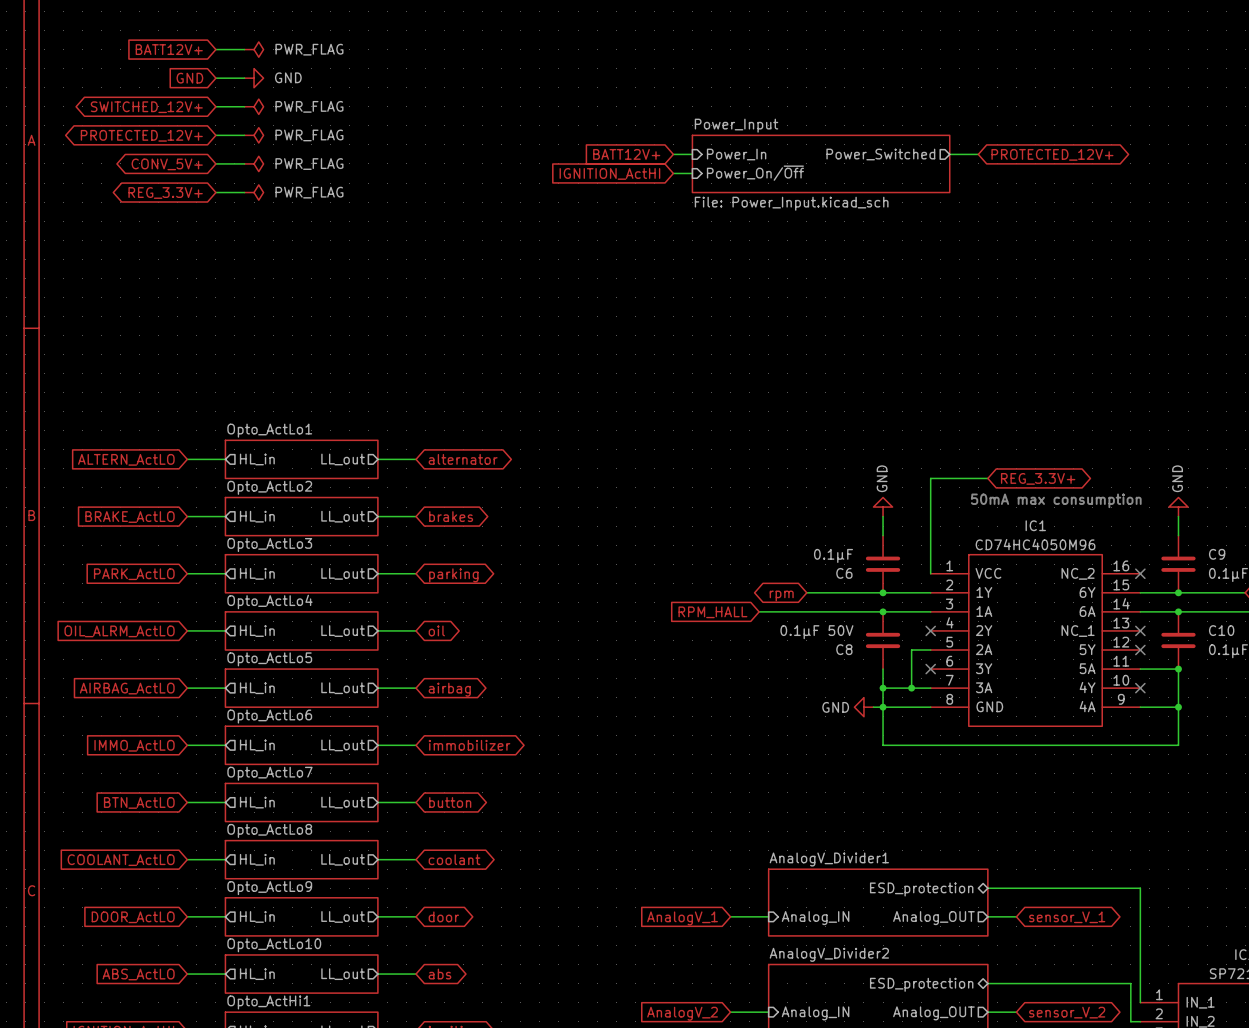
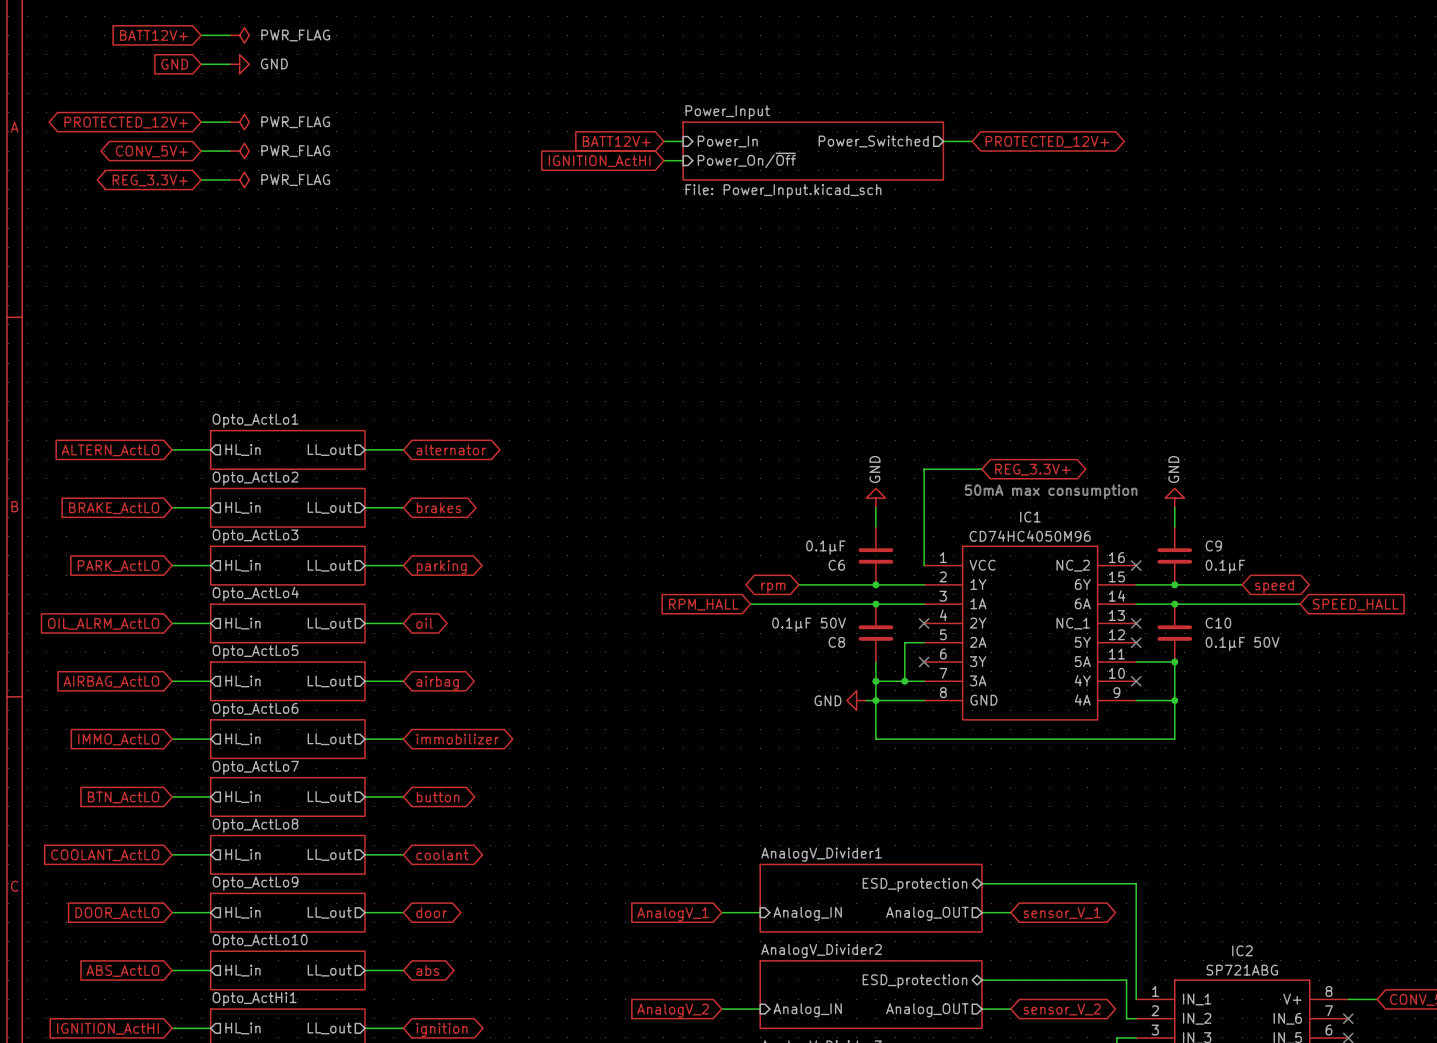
wire: (215, 106) (244, 106) -> none
power symbol: PWR_FLAG (254, 106) -> none
global label: SWITCHED_12V+ (146, 107) -> none

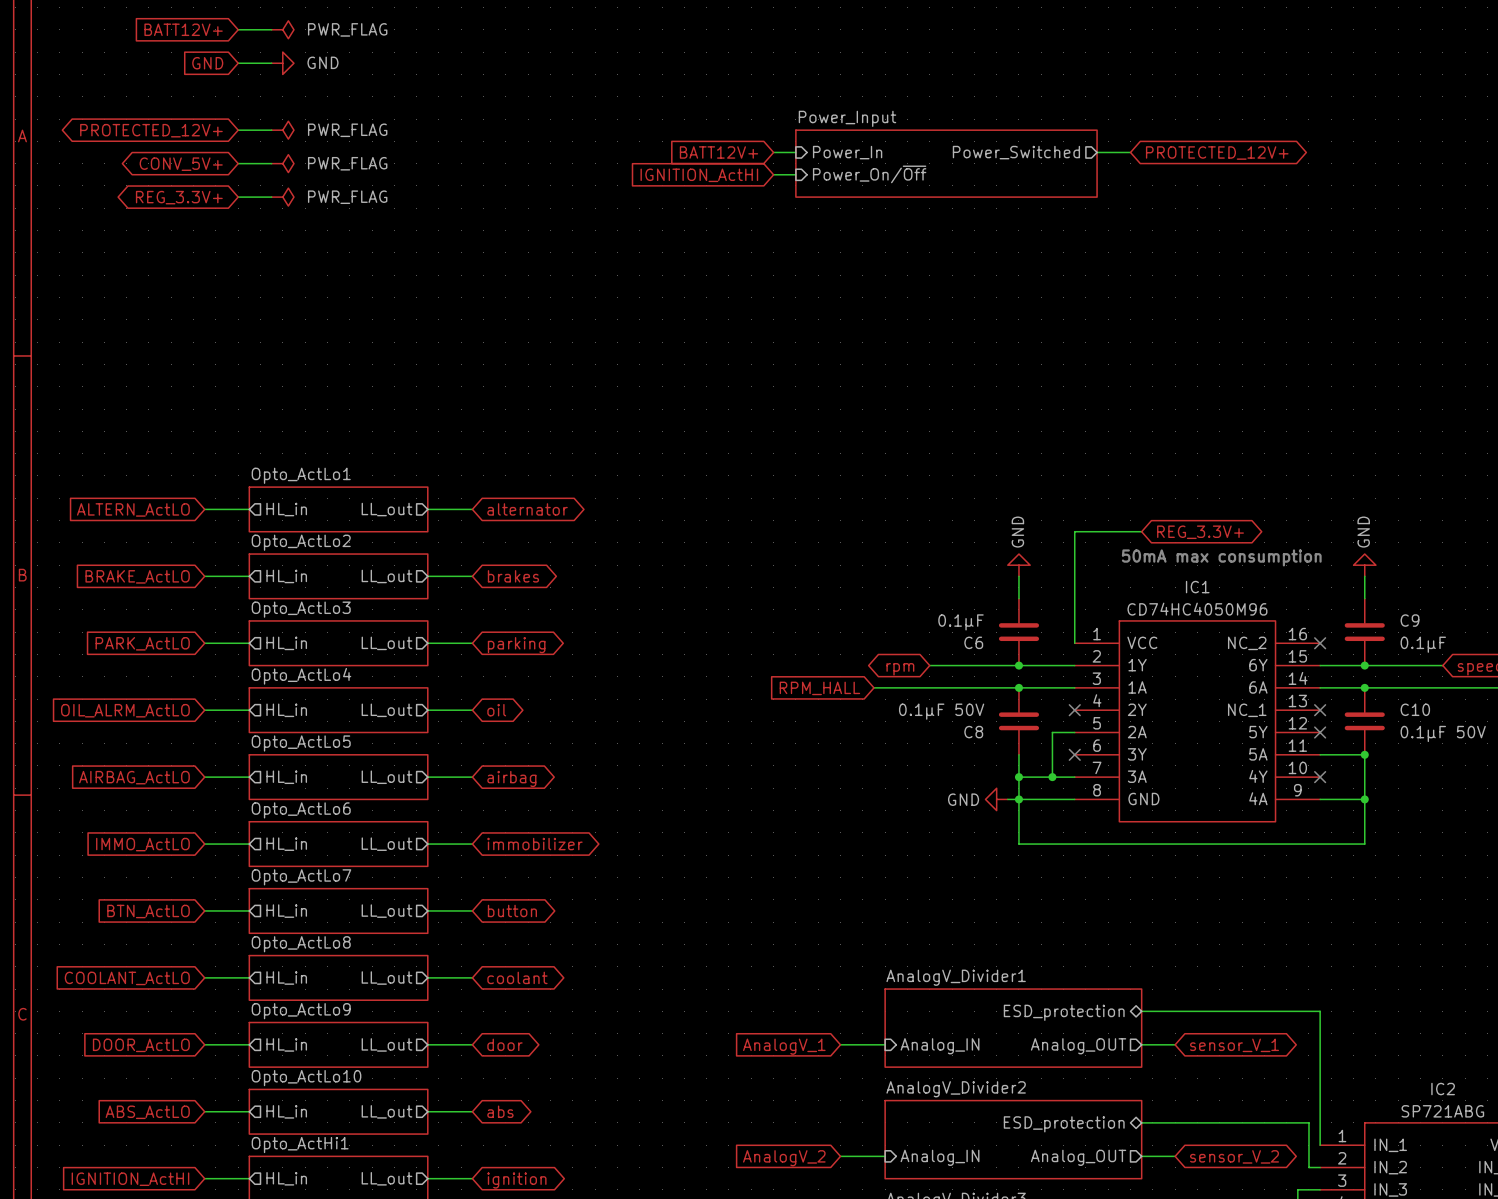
sheet Power_Input value: File: Power_Input.kicad_sch (783, 191) -> none

